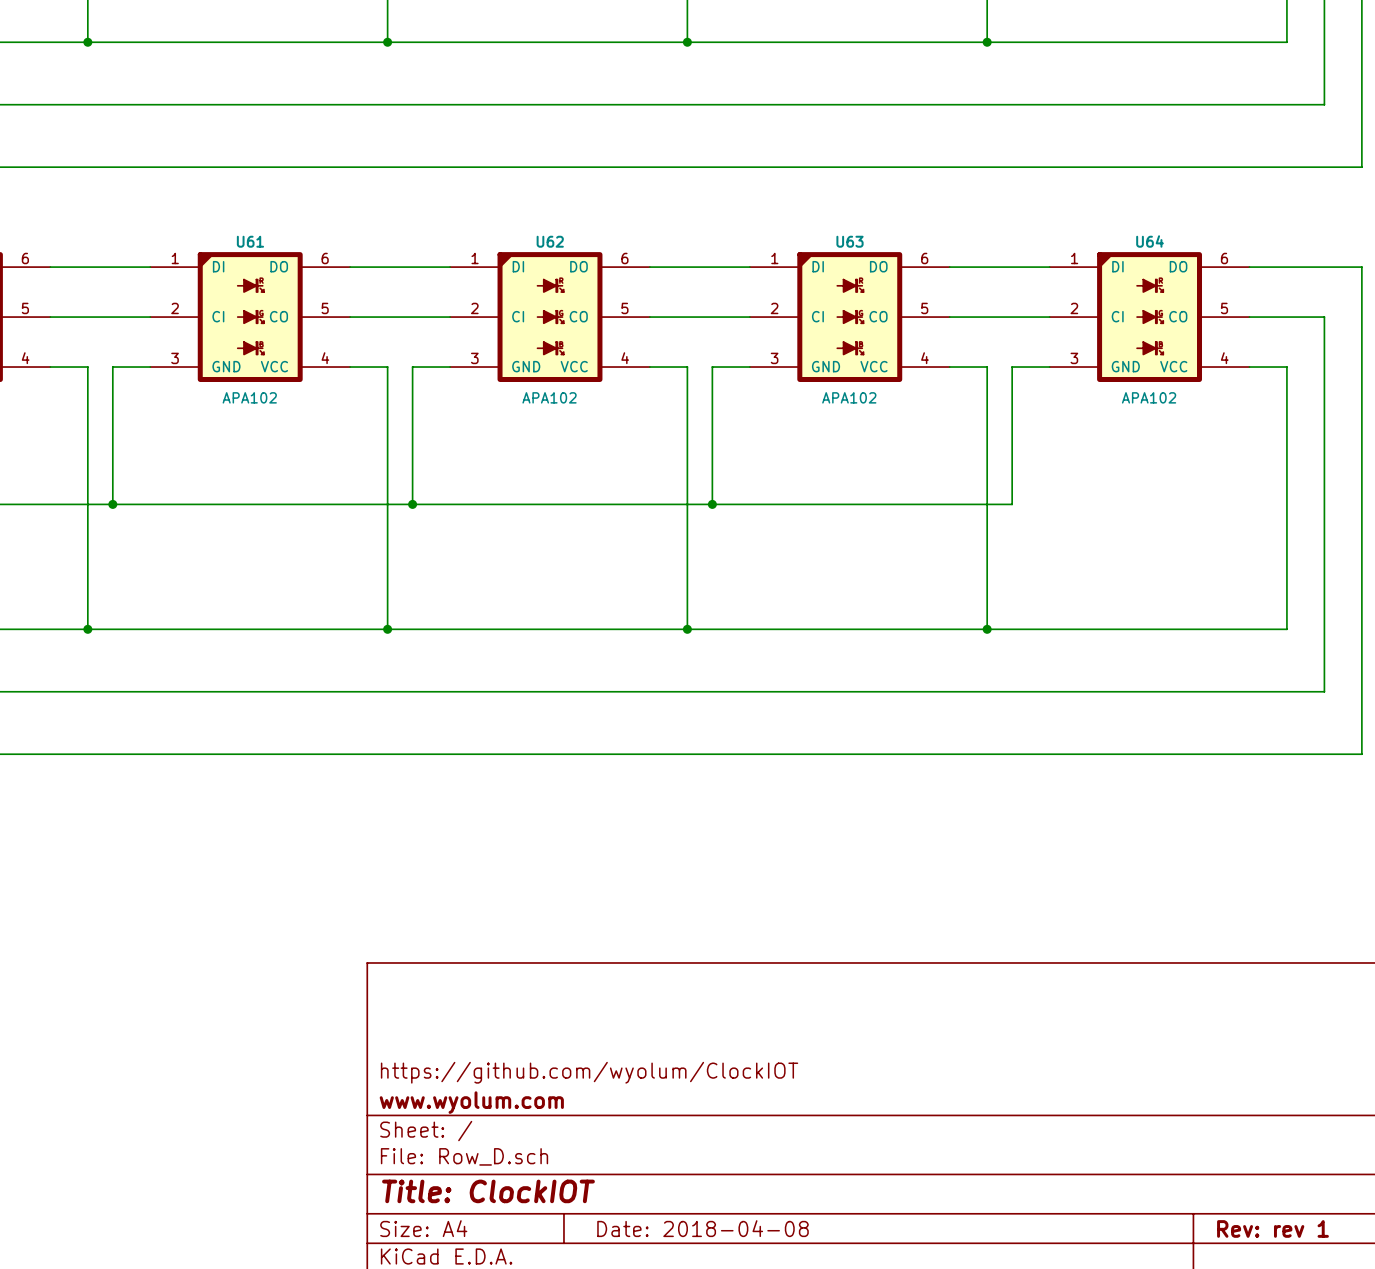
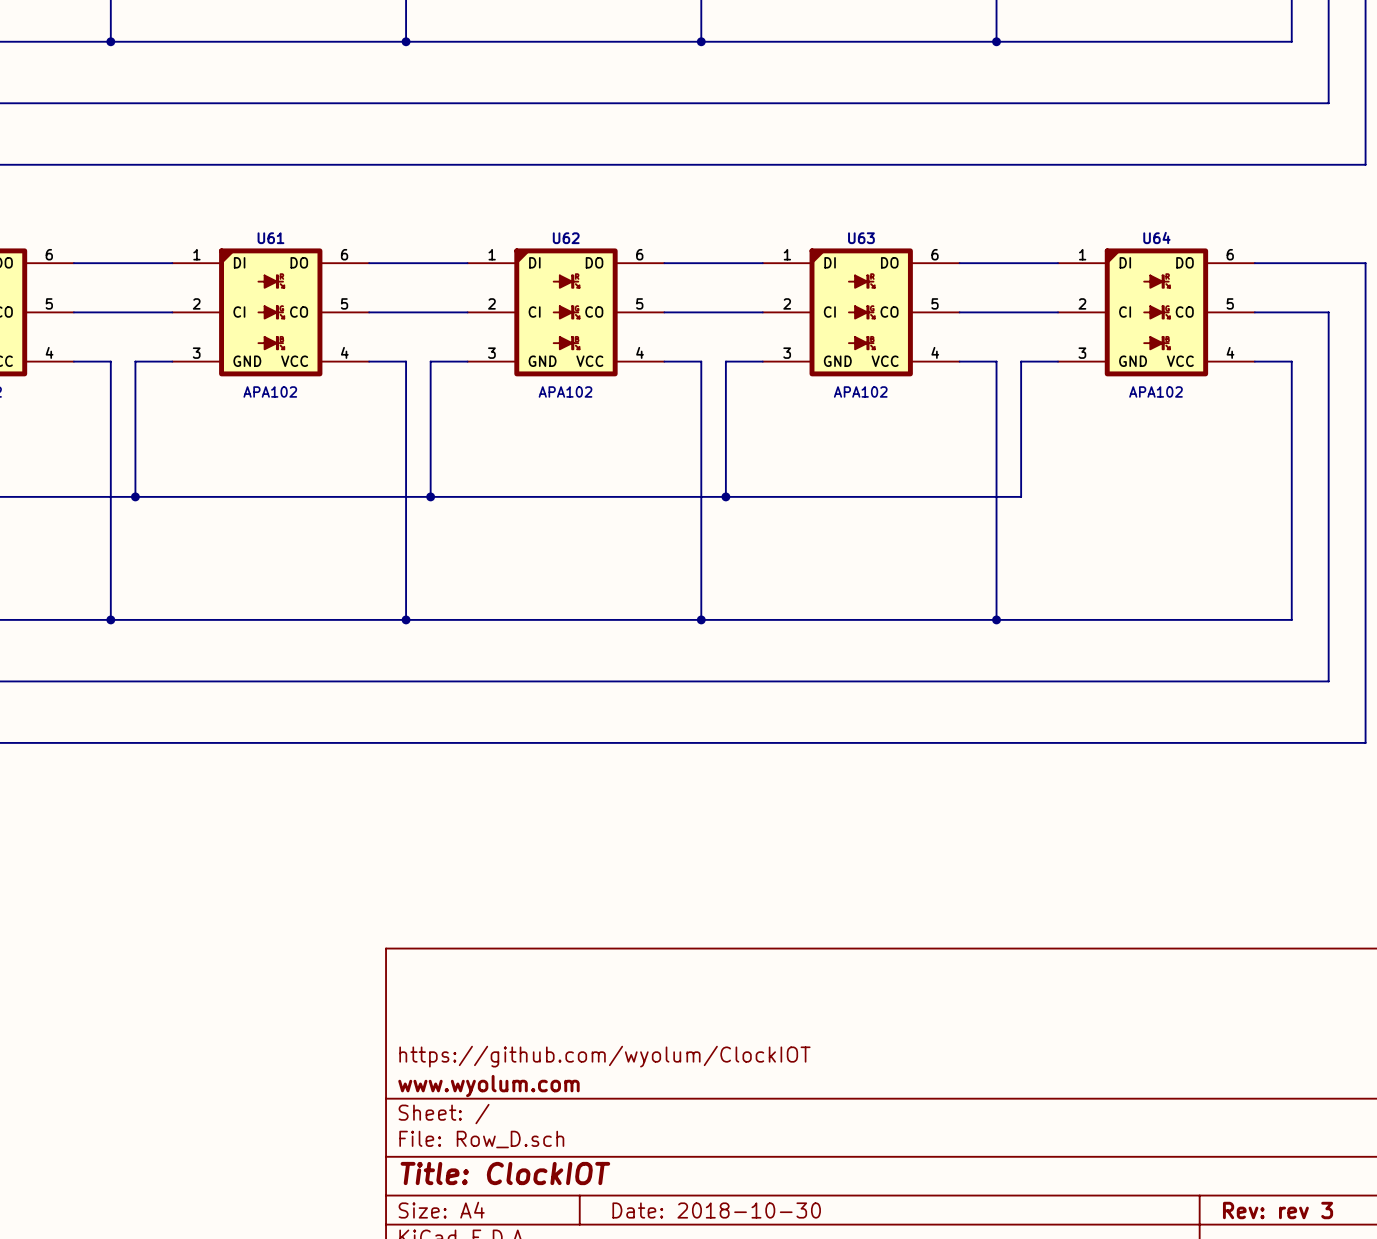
title block: Date: 2018-04-08 (703, 1228) -> Date: 2018-10-30 (716, 1210)
title block: Rev: rev 1 (1273, 1228) -> Rev: rev 3 (1278, 1210)

